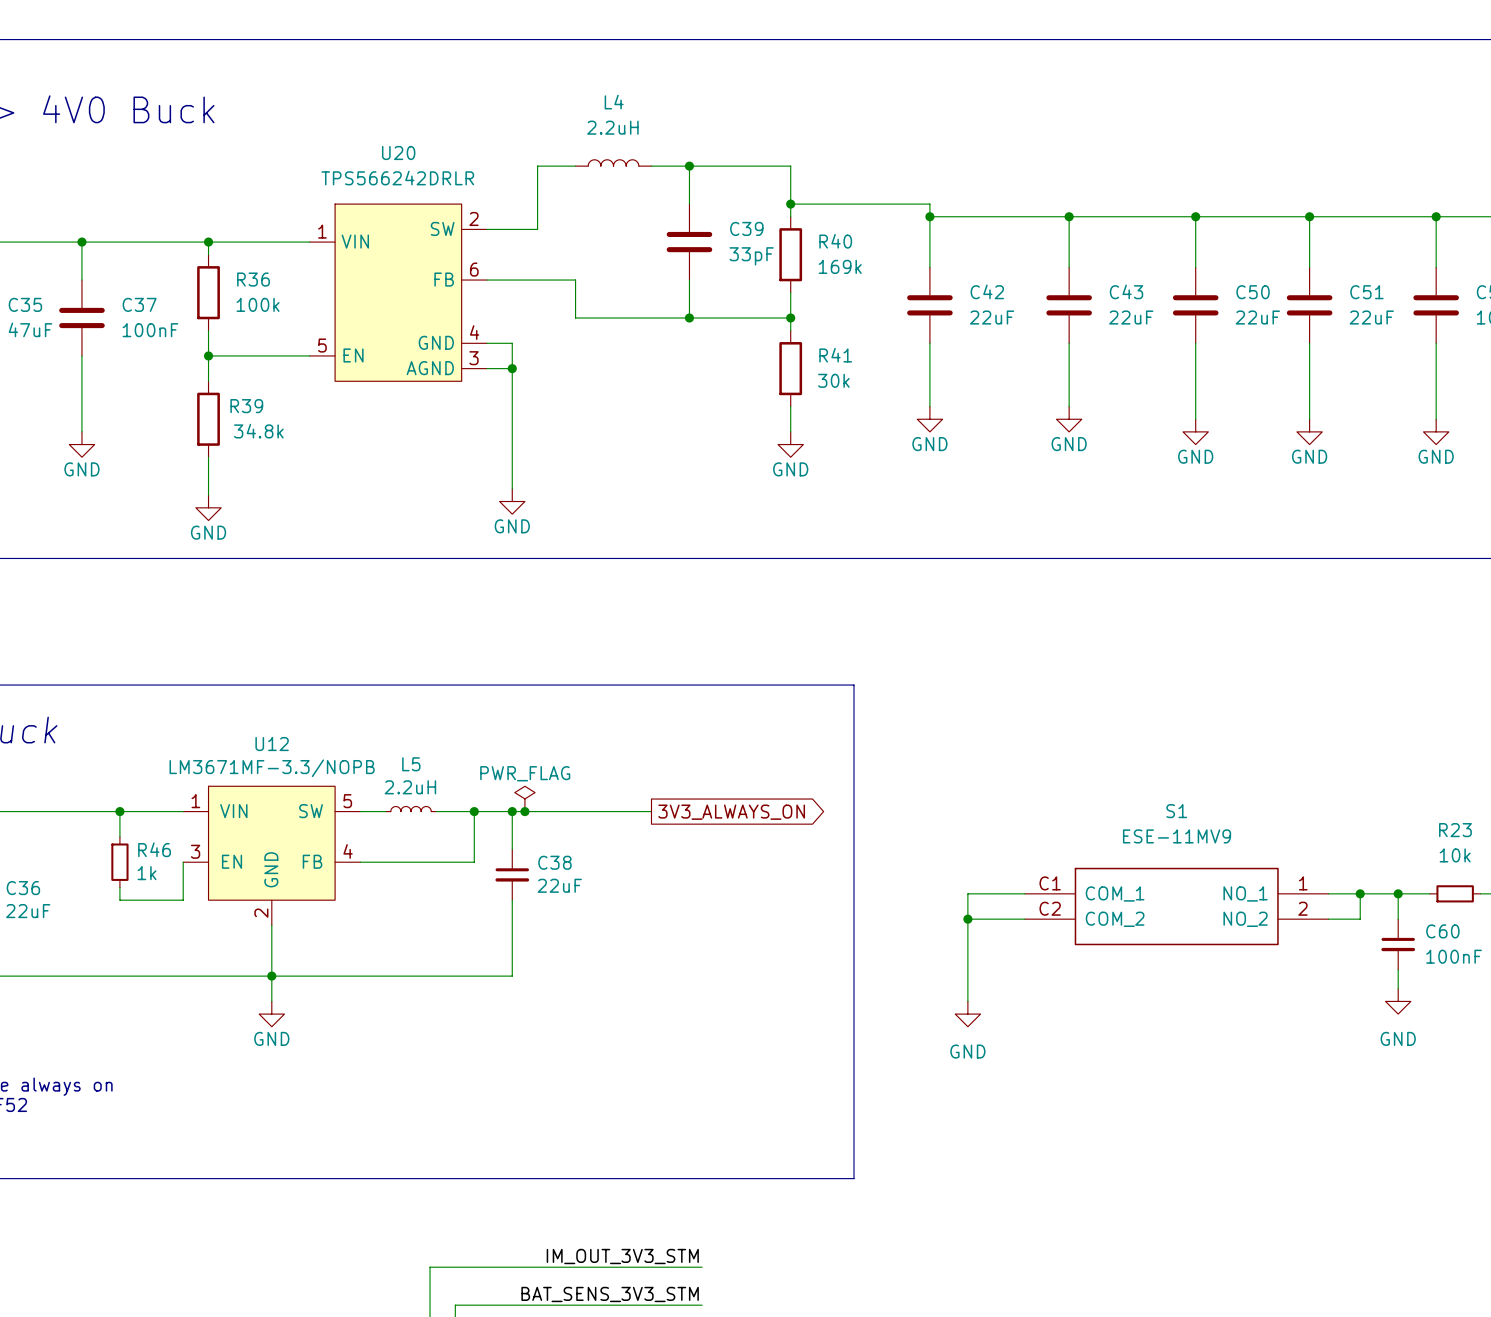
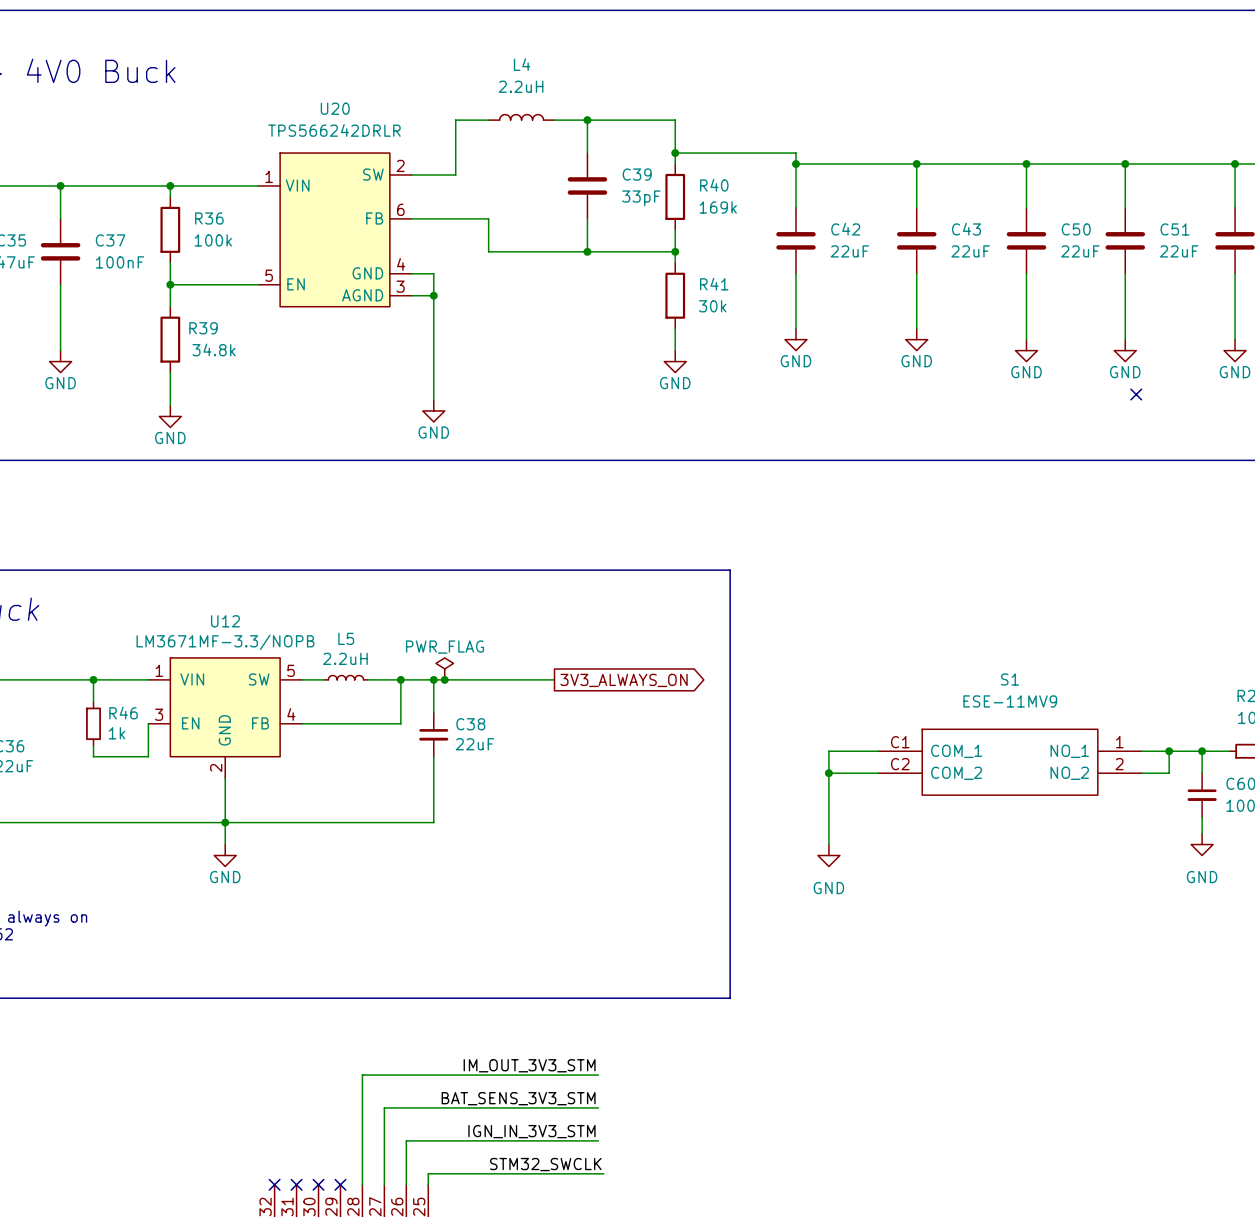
no-connect mark: none -> (1136, 394)

